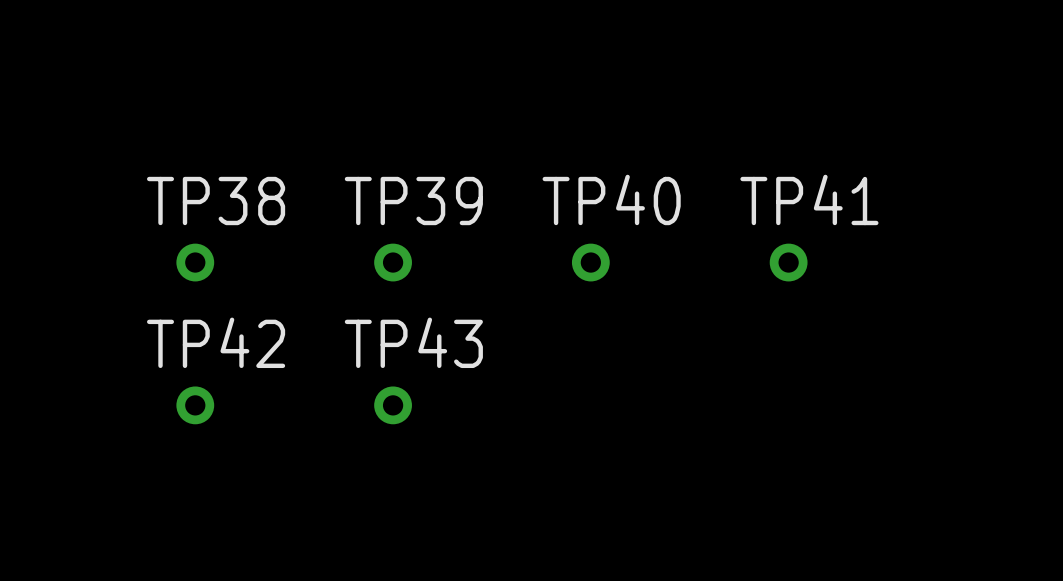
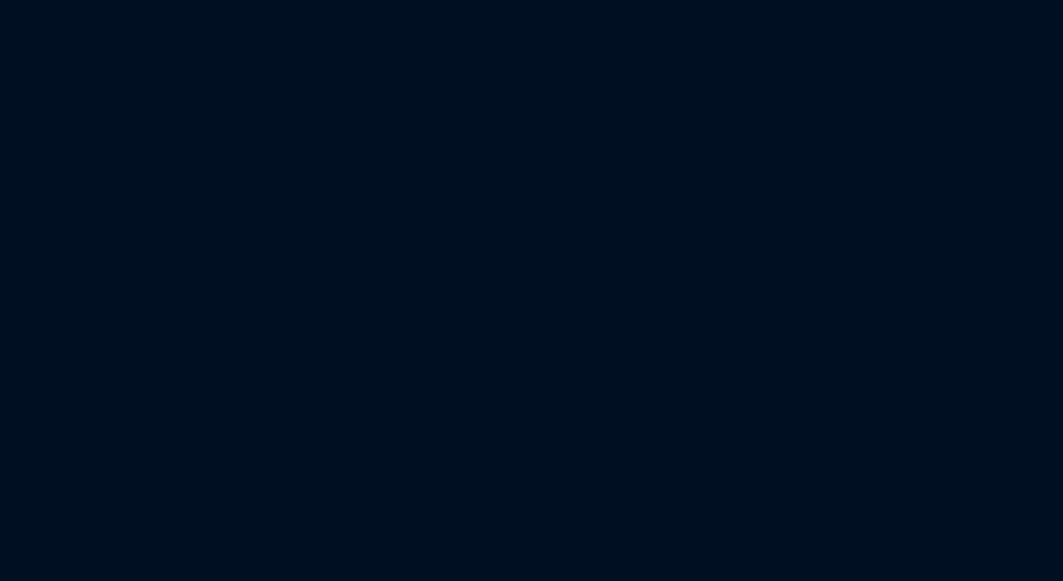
TP38: (195, 262) -> none
TP39: (393, 262) -> none
TP40: (590, 262) -> none
TP41: (788, 262) -> none
TP42: (195, 405) -> none
TP43: (393, 405) -> none

